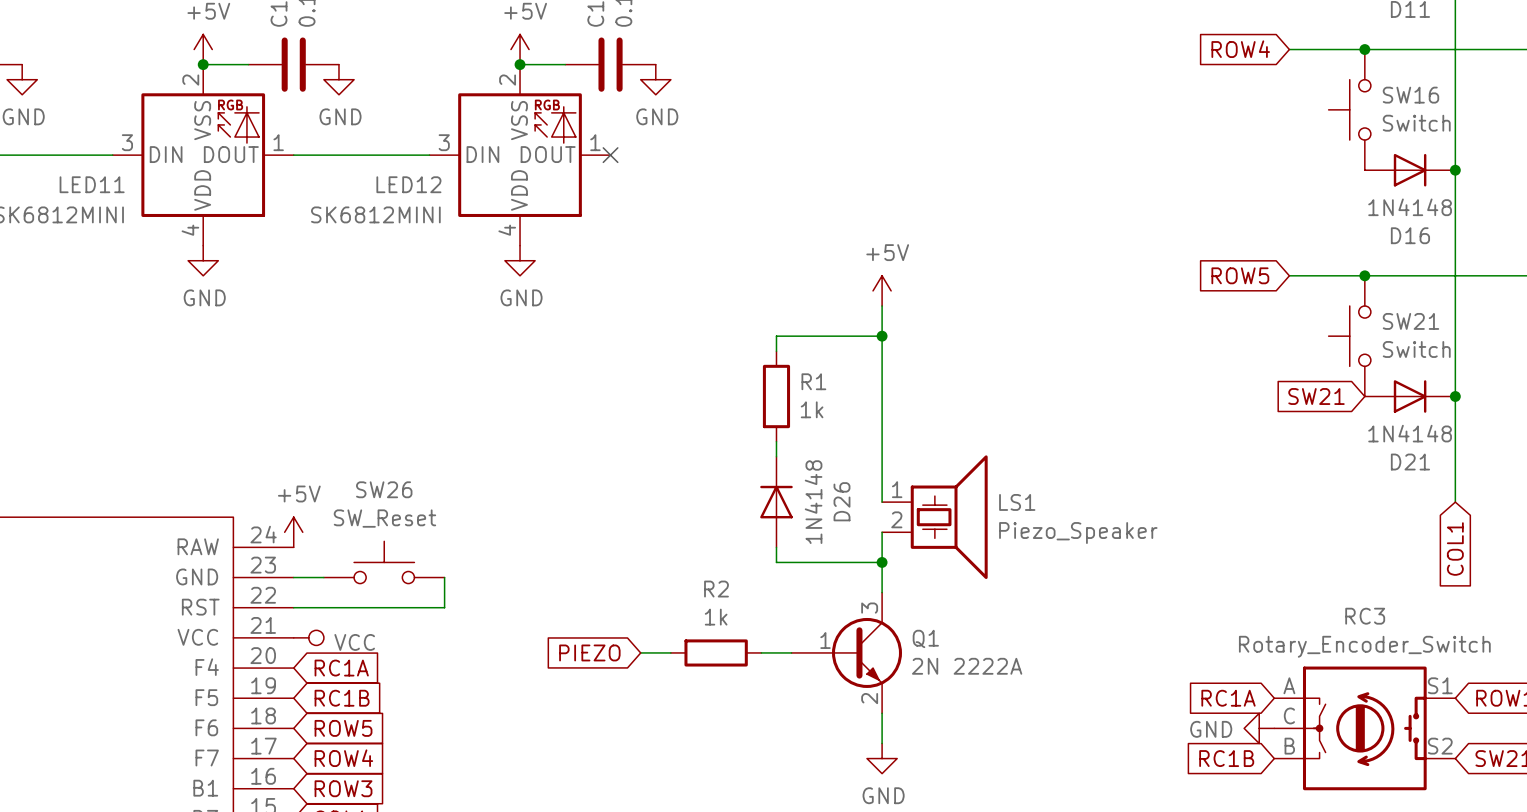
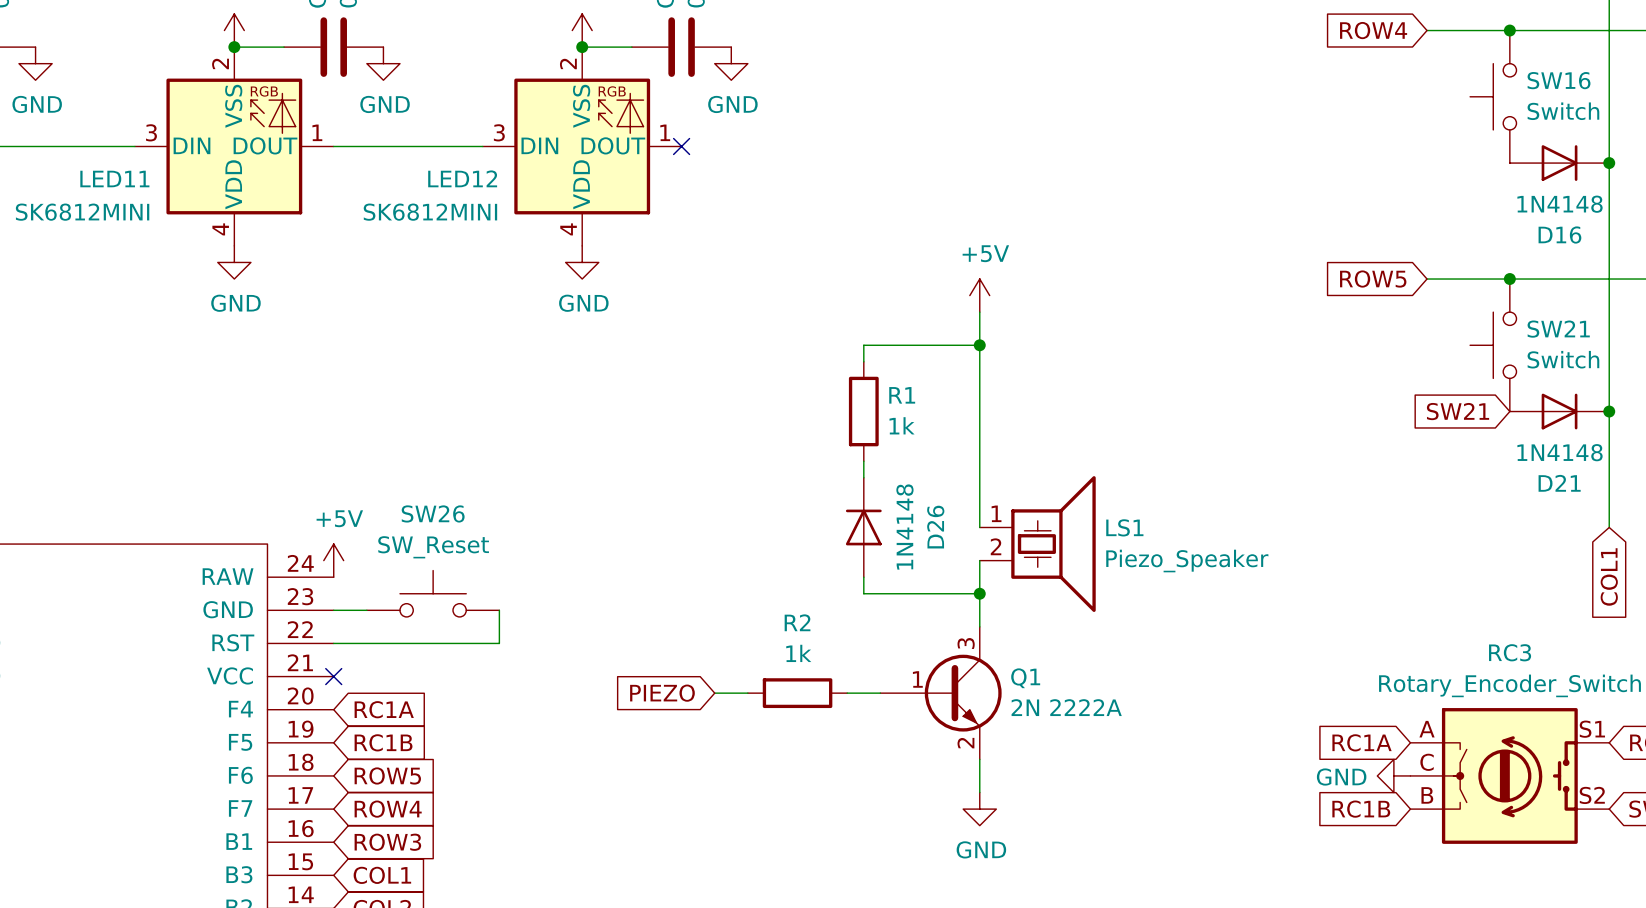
no-connect mark: none -> (333, 676)
power symbol: VCC (308, 637) -> none

